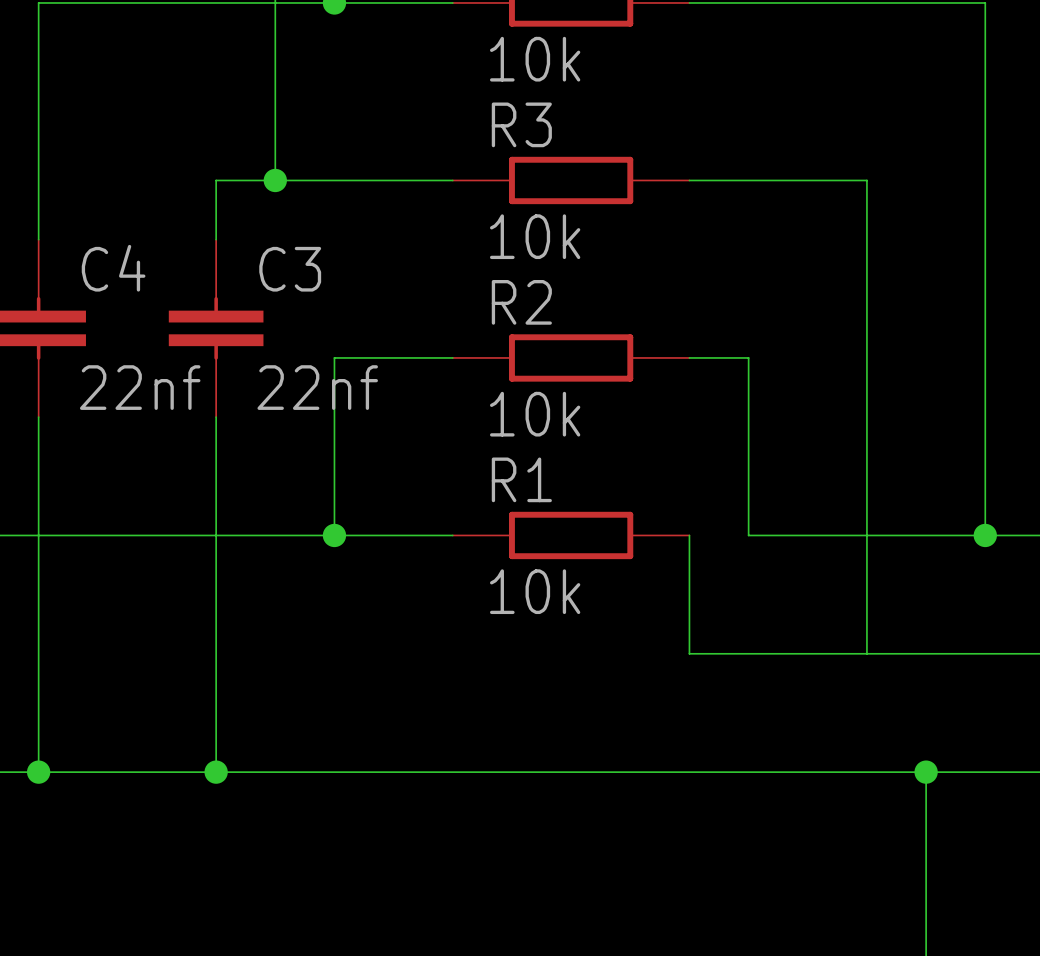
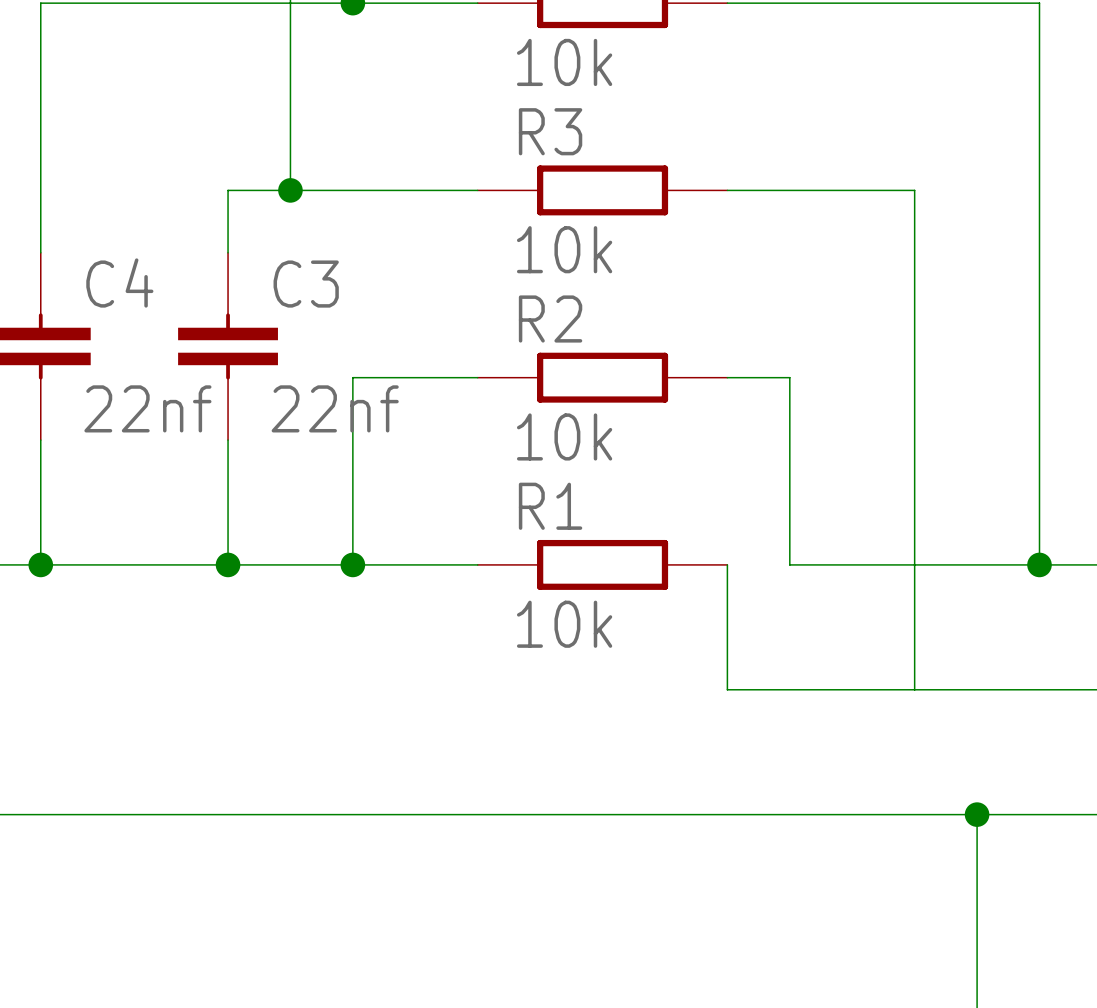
wire: (38, 535) (38, 772) -> none
junction: none -> (40, 564)
wire: (216, 535) (216, 772) -> none
junction: none -> (228, 564)
junction: (38, 772) -> none
junction: (216, 772) -> none

